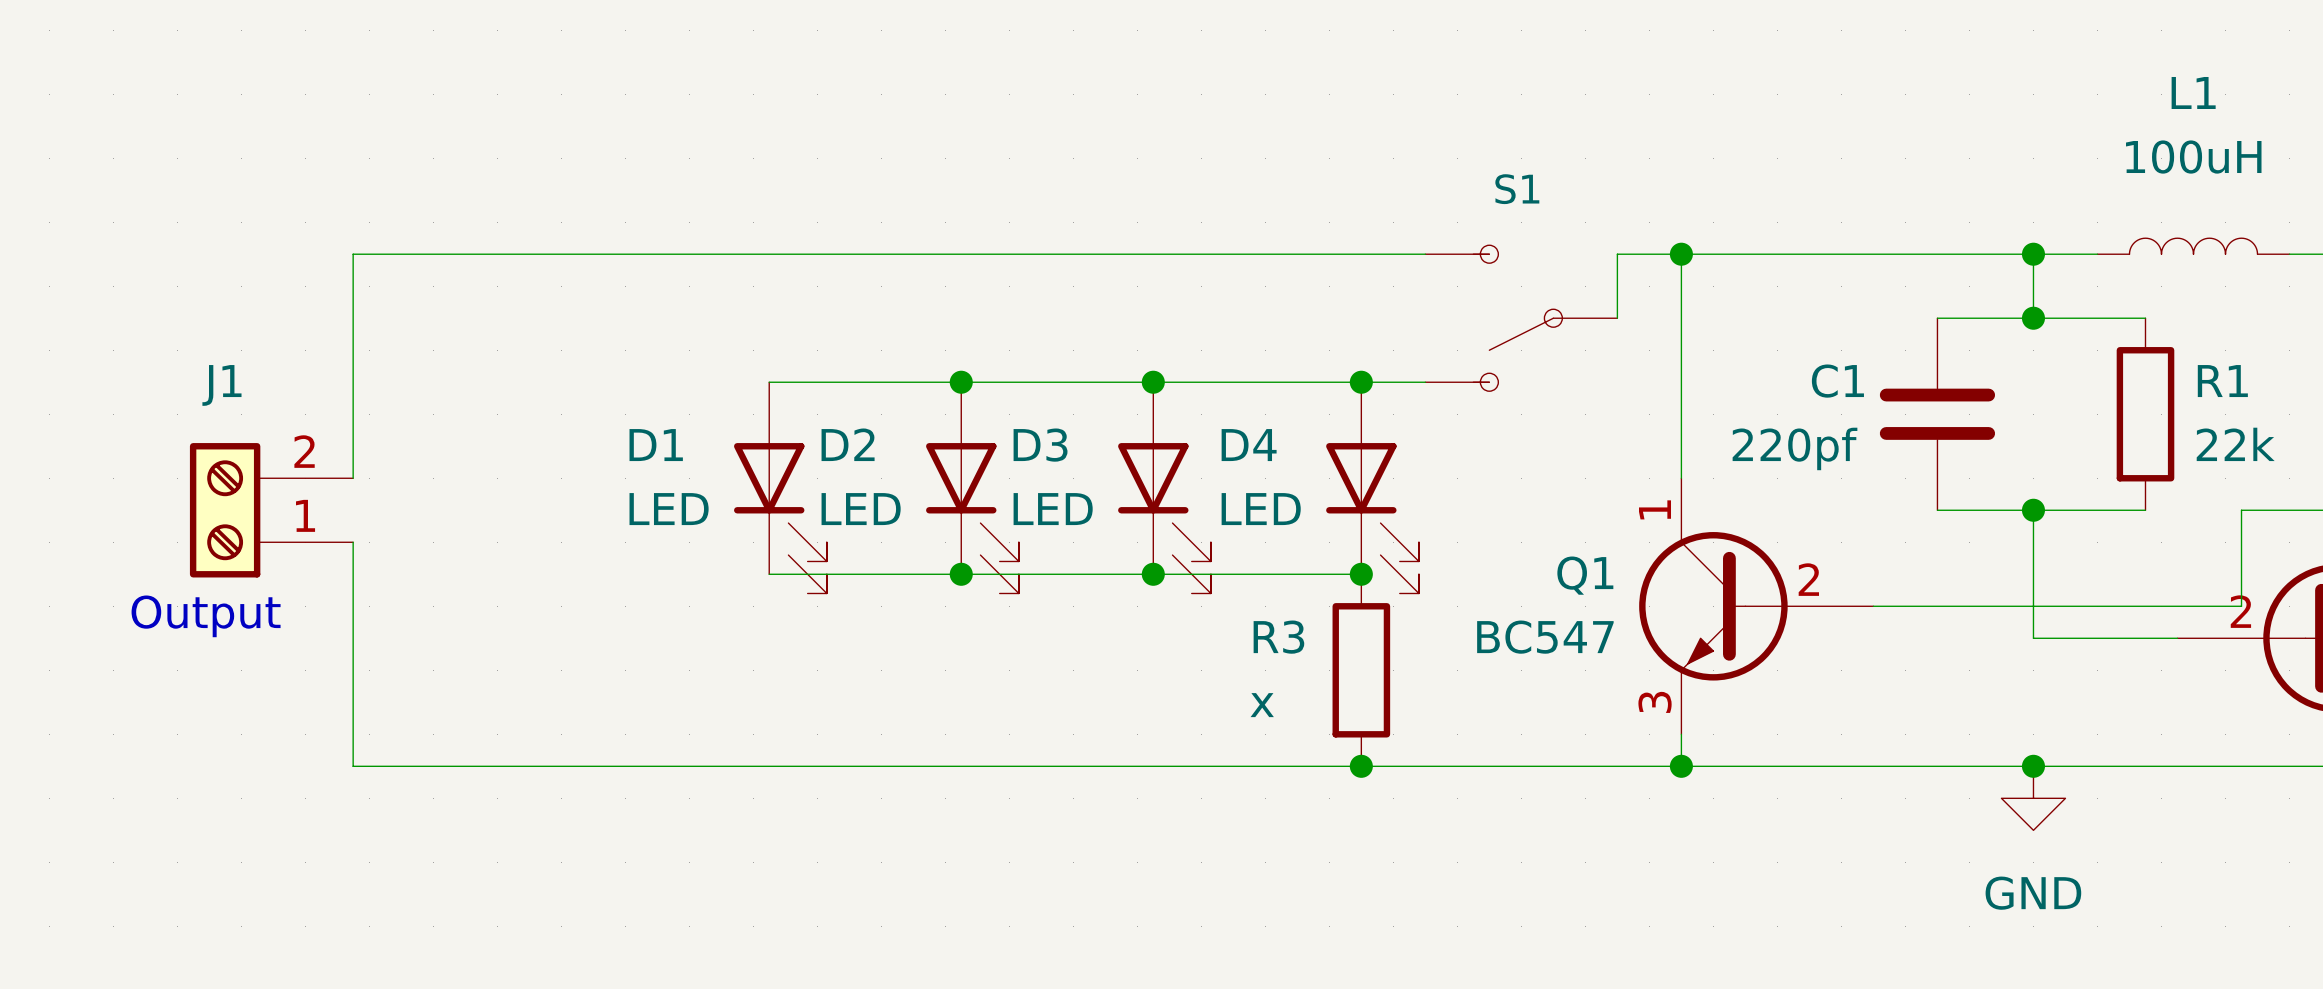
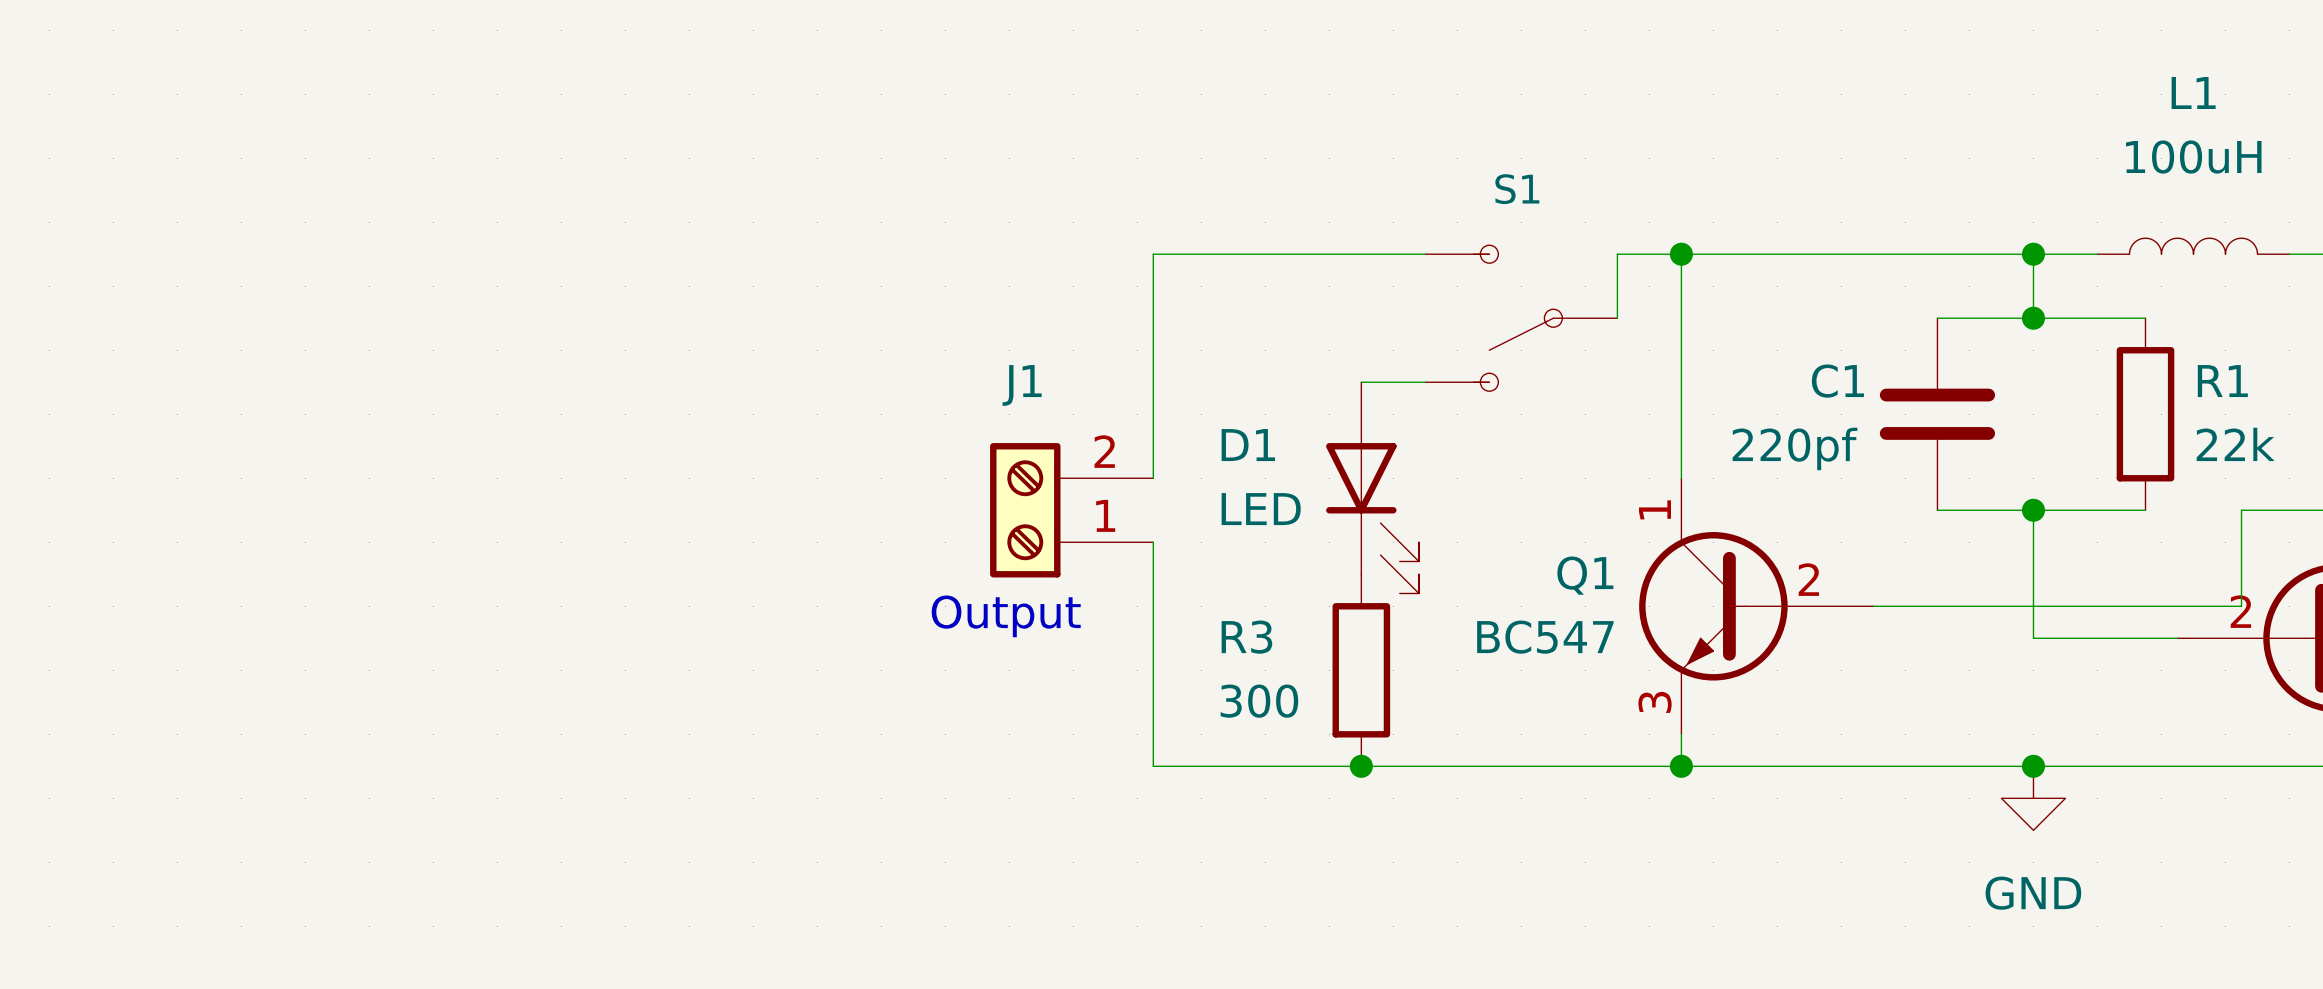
wire: (1153, 254) (353, 254) (353, 478) -> (1153, 254) (1153, 478)
wire: (769, 382) (1361, 382) -> none
junction: (961, 382) -> none
junction: (1153, 382) -> none
junction: (1361, 382) -> none
D4 name: D4 (1249, 445) -> D1 (1248, 445)
D1: LED (780, 487) -> none
D2: LED (972, 487) -> none
D3: LED (1164, 487) -> none
J1 position: (271, 510) -> (1071, 510)
wire: (353, 542) (353, 766) (1153, 766) -> (1153, 542) (1153, 766)
wire: (769, 574) (1361, 574) -> none
junction: (961, 574) -> none
junction: (1153, 574) -> none
junction: (1361, 574) -> none
text: Output (206, 616) -> none
text: none -> Output (1006, 616)
R3 name position: R3 (1278, 637) -> R3 (1246, 637)
R3 value: x (1262, 705) -> 300 (1259, 701)

